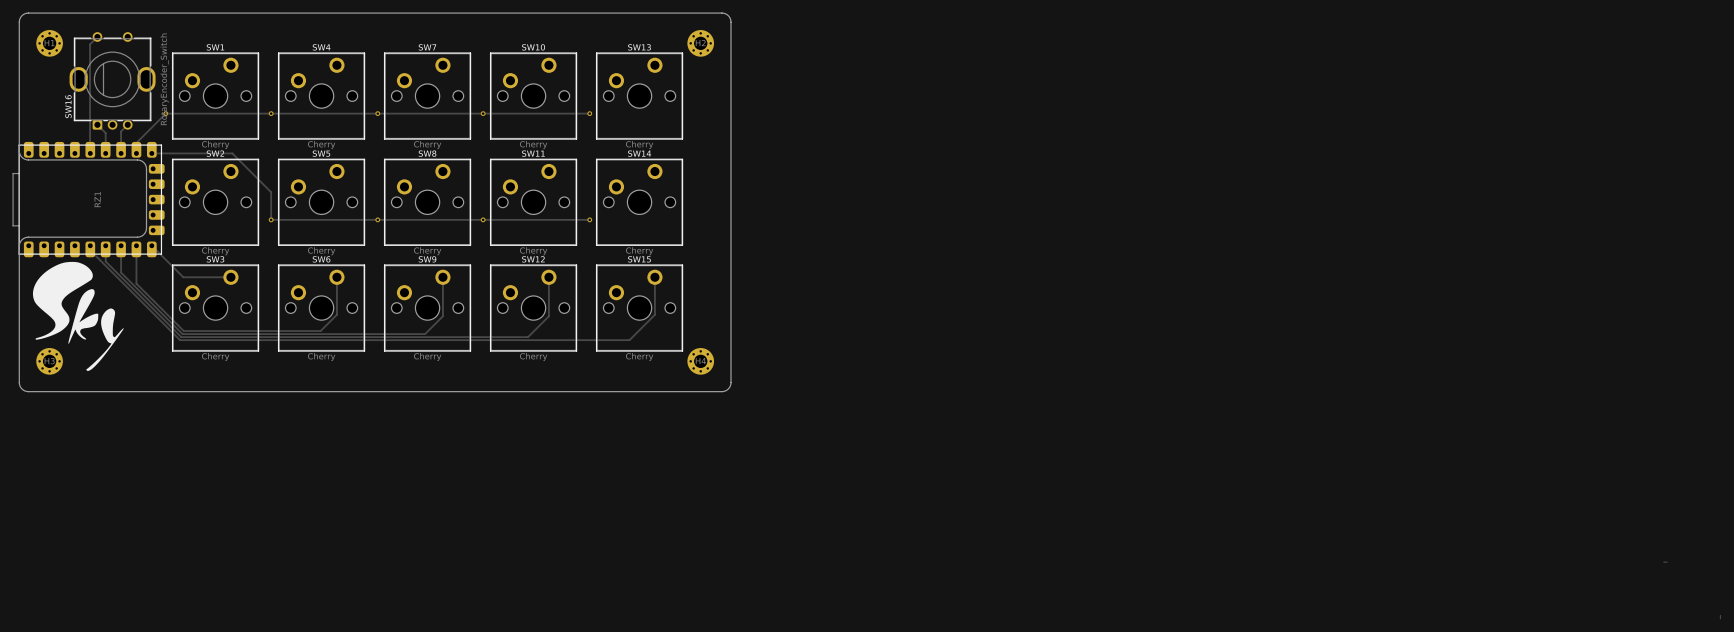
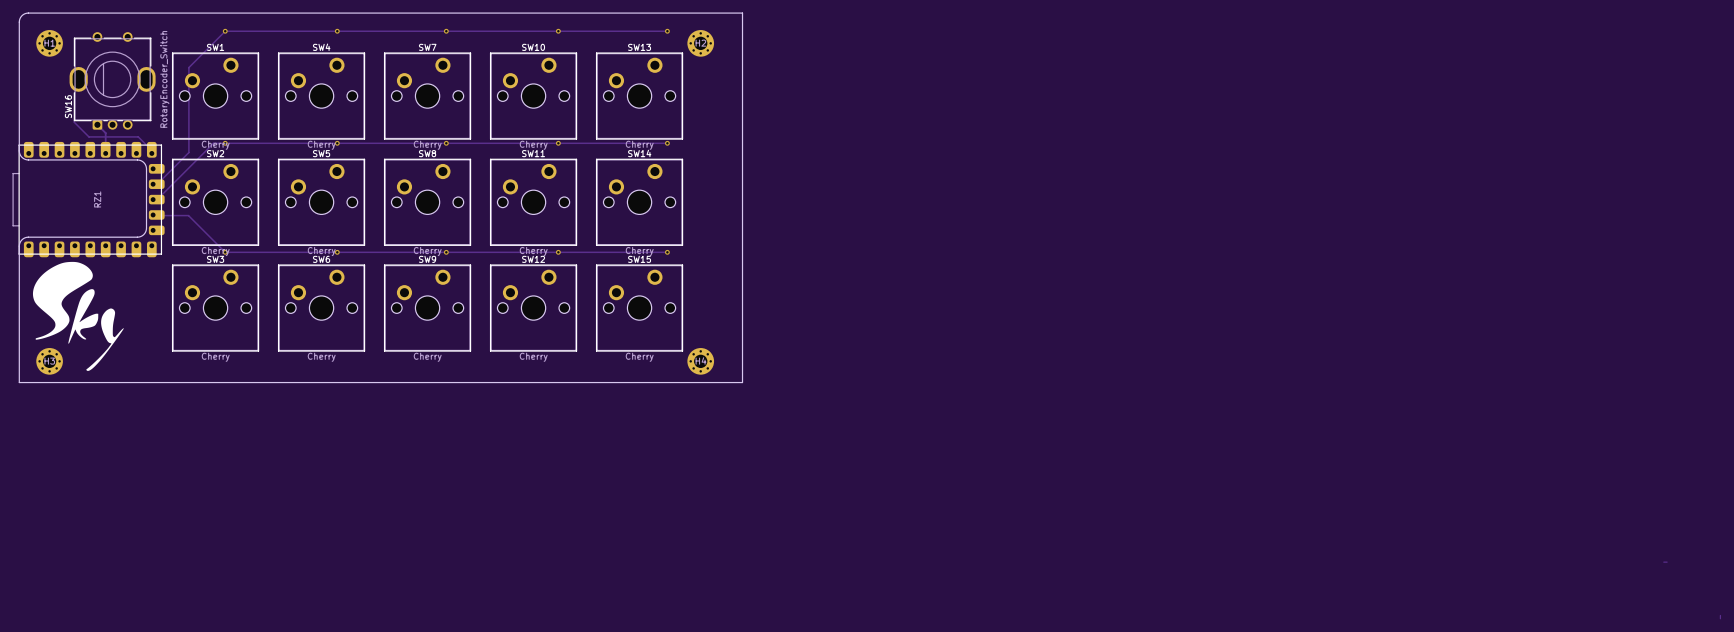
board edge: (721, 13) (728, 15) (731, 22) (731, 382) (726, 390) (28, 391) (21, 388) (19, 382) -> (721, 13) (742, 13) (742, 382) (19, 382)
via: none -> (225, 31)
via: none -> (337, 31)
via: none -> (446, 31)
via: none -> (558, 31)
track: none -> (667, 31) (225, 31) (188, 67) (188, 152) (156, 184) (154, 184)
via: none -> (667, 31)
track: (97, 37) (90, 44) (90, 153) -> none
track: (165, 113) (589, 113) -> none
track: (165, 113) (136, 142) (136, 153) -> none
via: (165, 113) -> none
via: (271, 113) -> none
via: (377, 113) -> none
via: (483, 113) -> none
via: (589, 113) -> none
track: none -> (73, 121) (88, 136) (138, 136) (153, 151) (153, 154)
track: (127, 124) (121, 131) (121, 153) -> none
via: none -> (225, 143)
via: none -> (337, 143)
via: none -> (446, 143)
via: none -> (558, 143)
track: none -> (667, 143) (213, 143) (156, 200) (154, 200)
via: none -> (667, 143)
track: (151, 153) (232, 153) (271, 192) (271, 219) (589, 219) -> none
track: none -> (154, 215) (188, 215) (225, 252) (667, 252)
via: (271, 219) -> none
via: (377, 219) -> none
via: (483, 219) -> none
via: (589, 219) -> none
track: (90, 245) (90, 250) (180, 340) (629, 340) (654, 314) (654, 277) -> none
track: (105, 245) (105, 261) (181, 337) (528, 337) (548, 316) (548, 277) -> none
track: (121, 245) (121, 272) (182, 334) (425, 334) (442, 316) (442, 277) -> none
track: (136, 245) (136, 283) (183, 331) (320, 331) (336, 314) (336, 277) -> none
track: (151, 245) (183, 277) (230, 277) -> none
via: none -> (225, 252)
via: none -> (337, 252)
via: none -> (446, 252)
via: none -> (558, 252)
via: none -> (667, 252)

